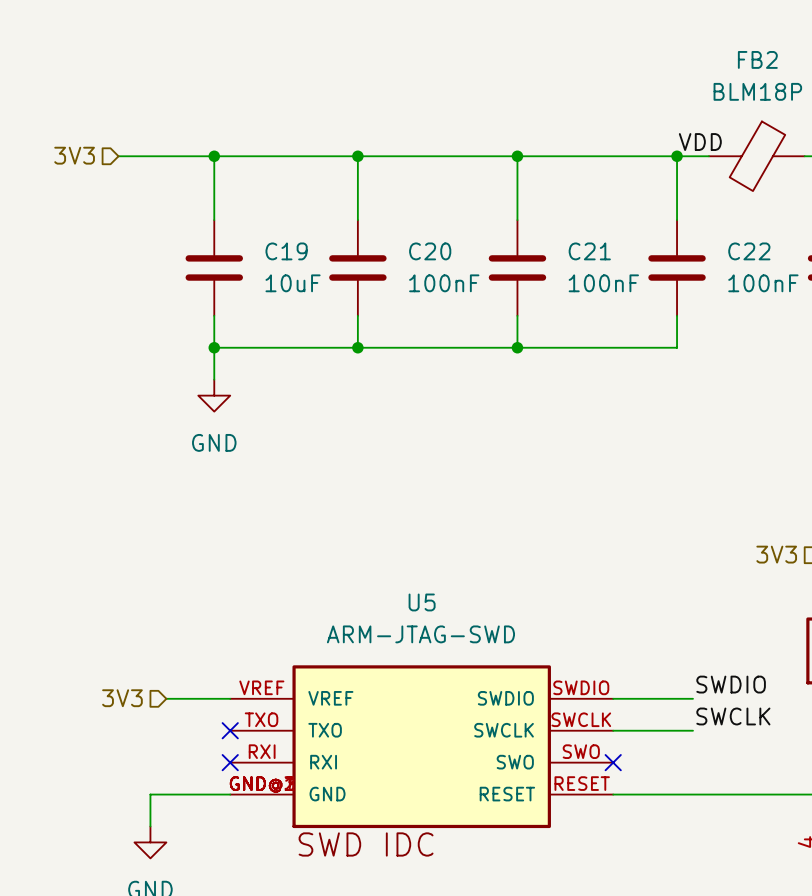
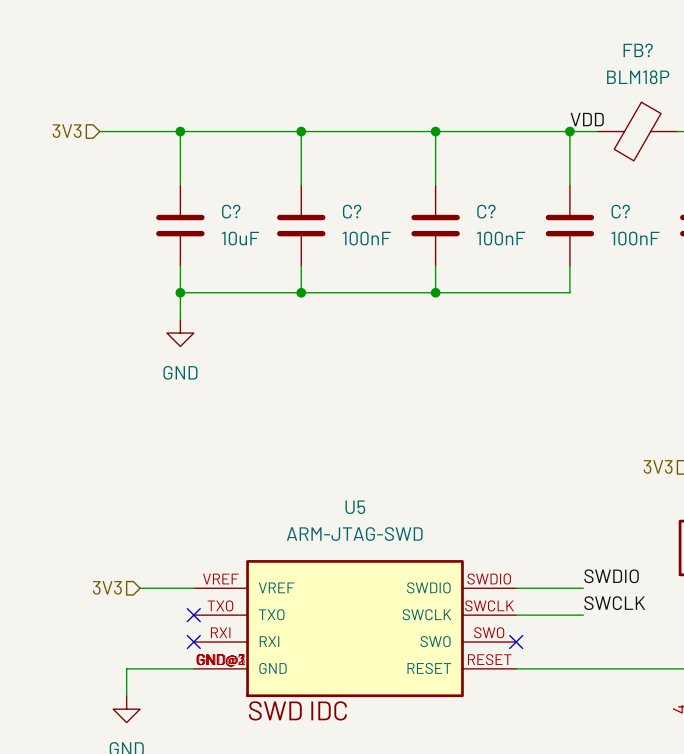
FB2 name: FB2 (757, 59) -> FB? (638, 50)
C19 name: C19 (286, 251) -> C? (231, 211)
C20 name: C20 (430, 251) -> C? (352, 211)
C21 name: C21 (589, 251) -> C? (486, 211)
C22 name: C22 (749, 251) -> C? (620, 211)

